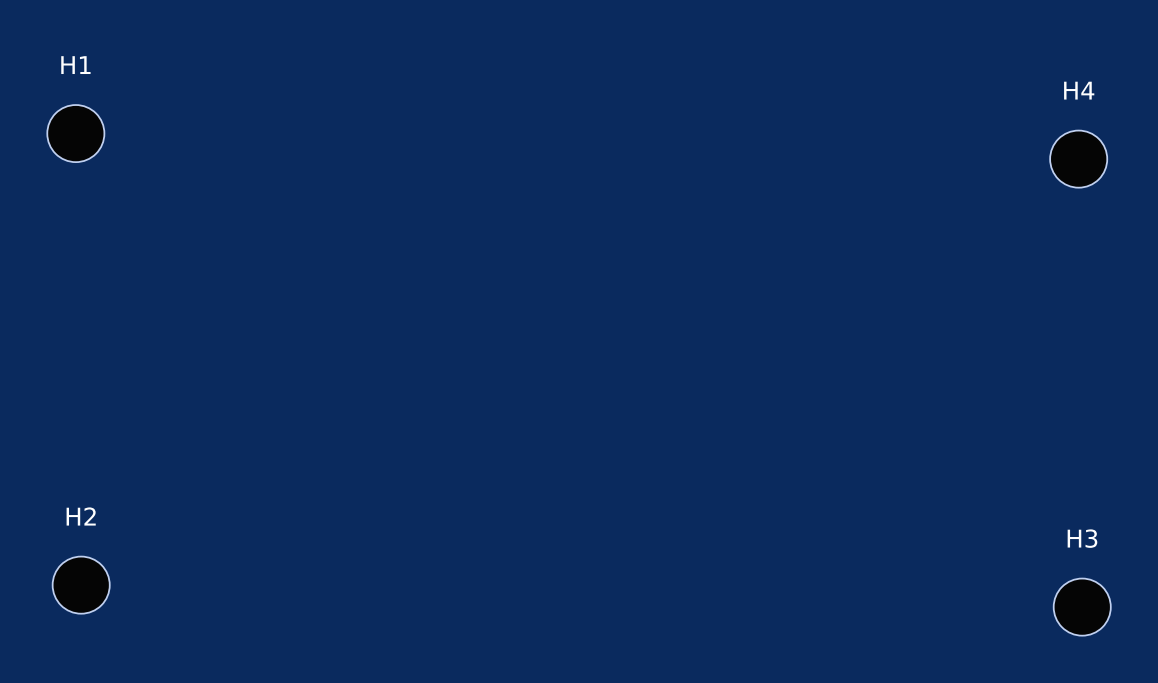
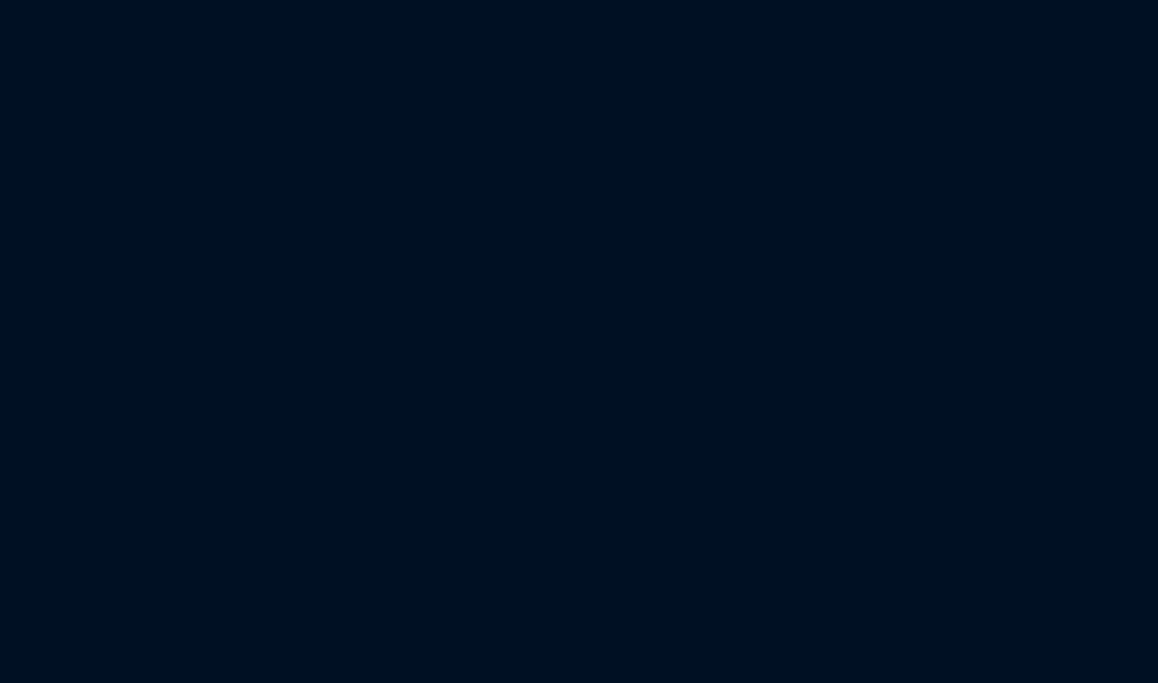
H1: (75, 133) -> none
H4: (1078, 159) -> none
H2: (81, 585) -> none
H3: (1082, 607) -> none

